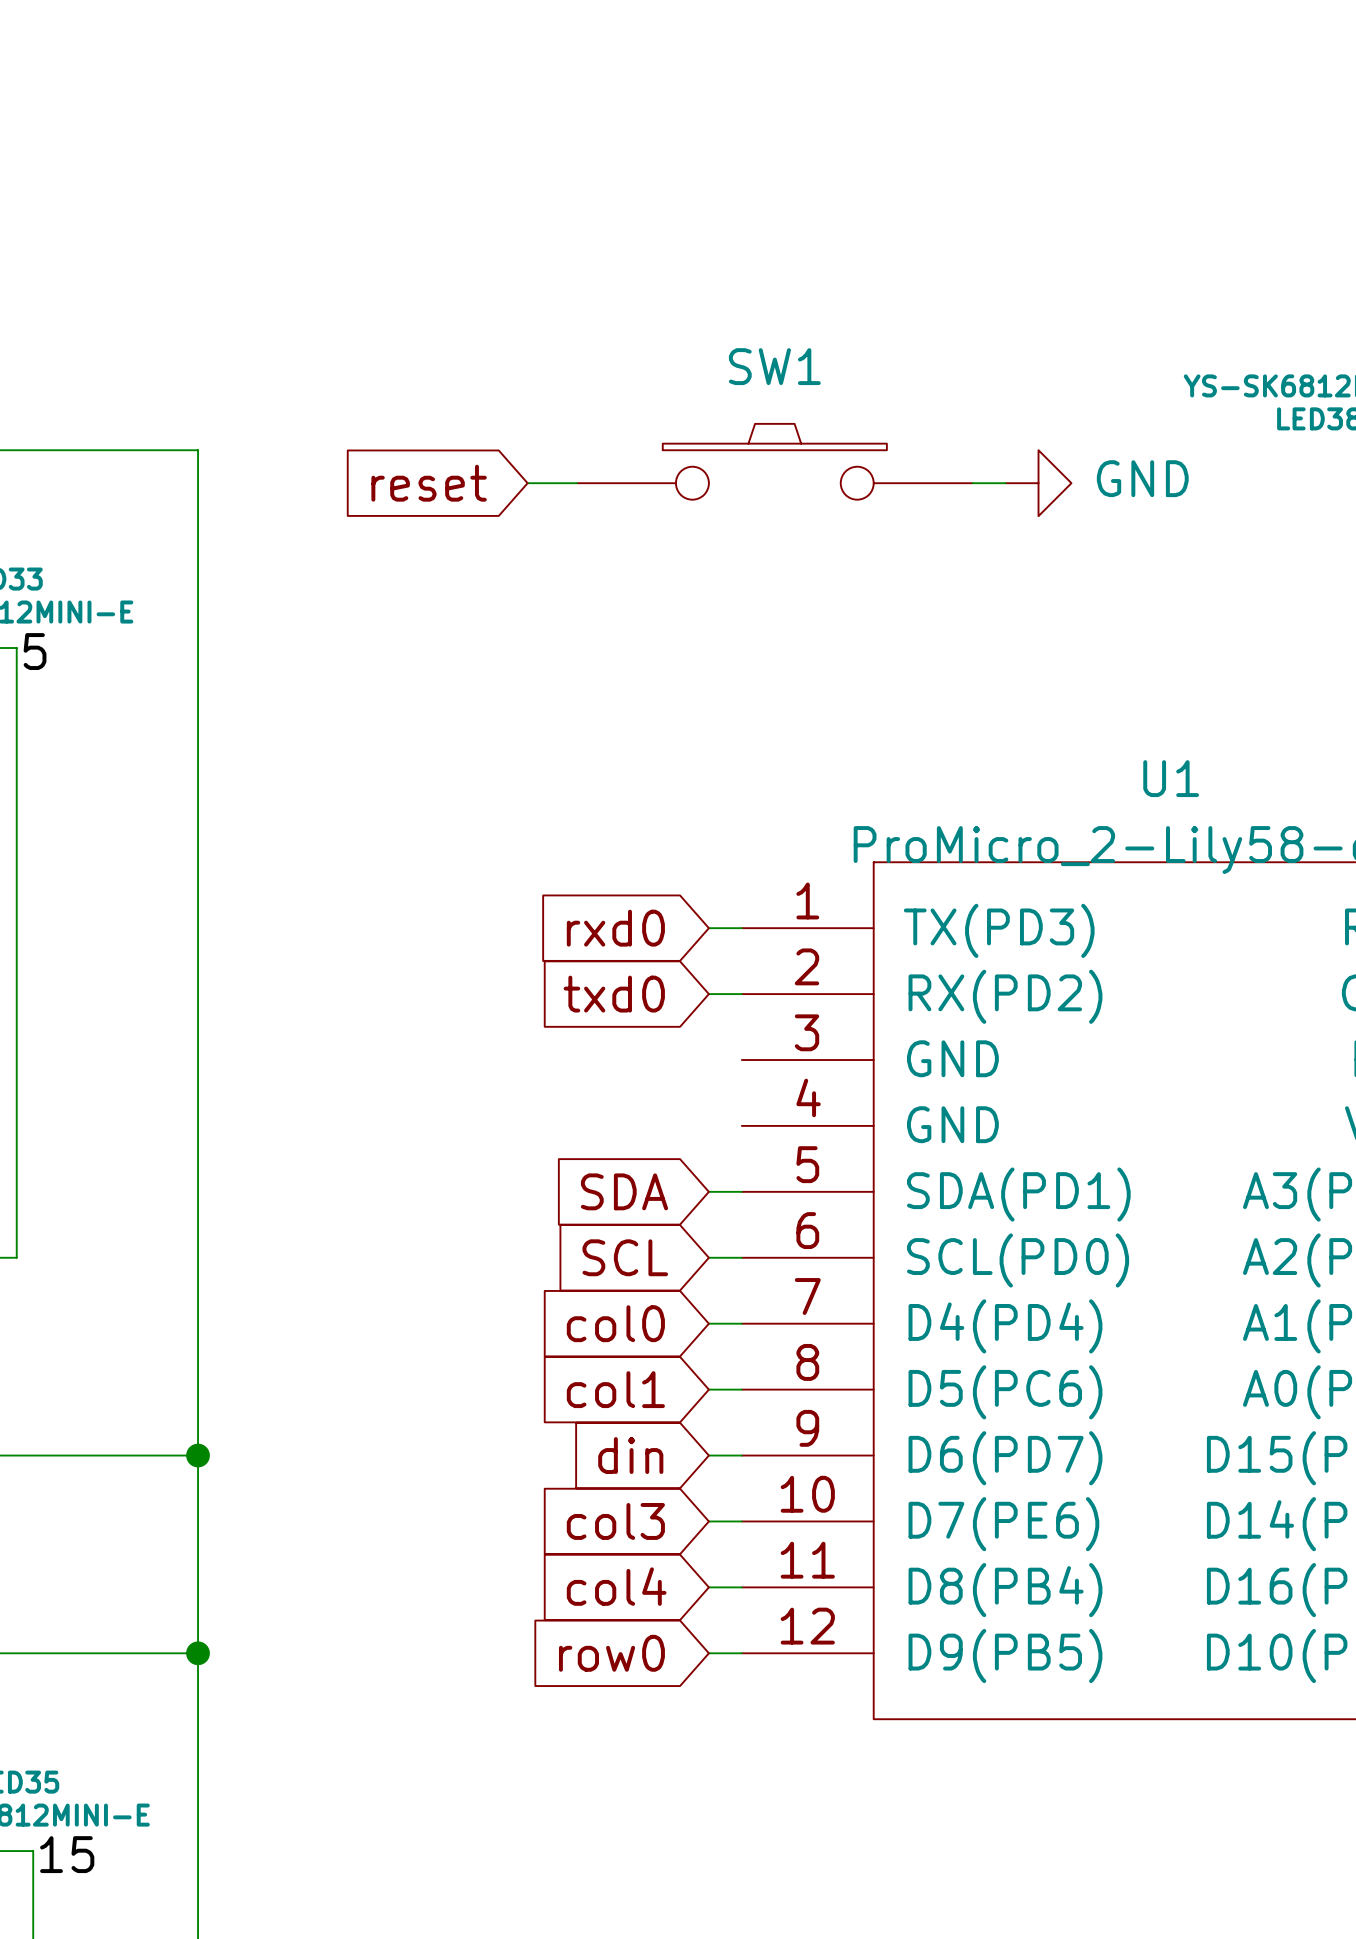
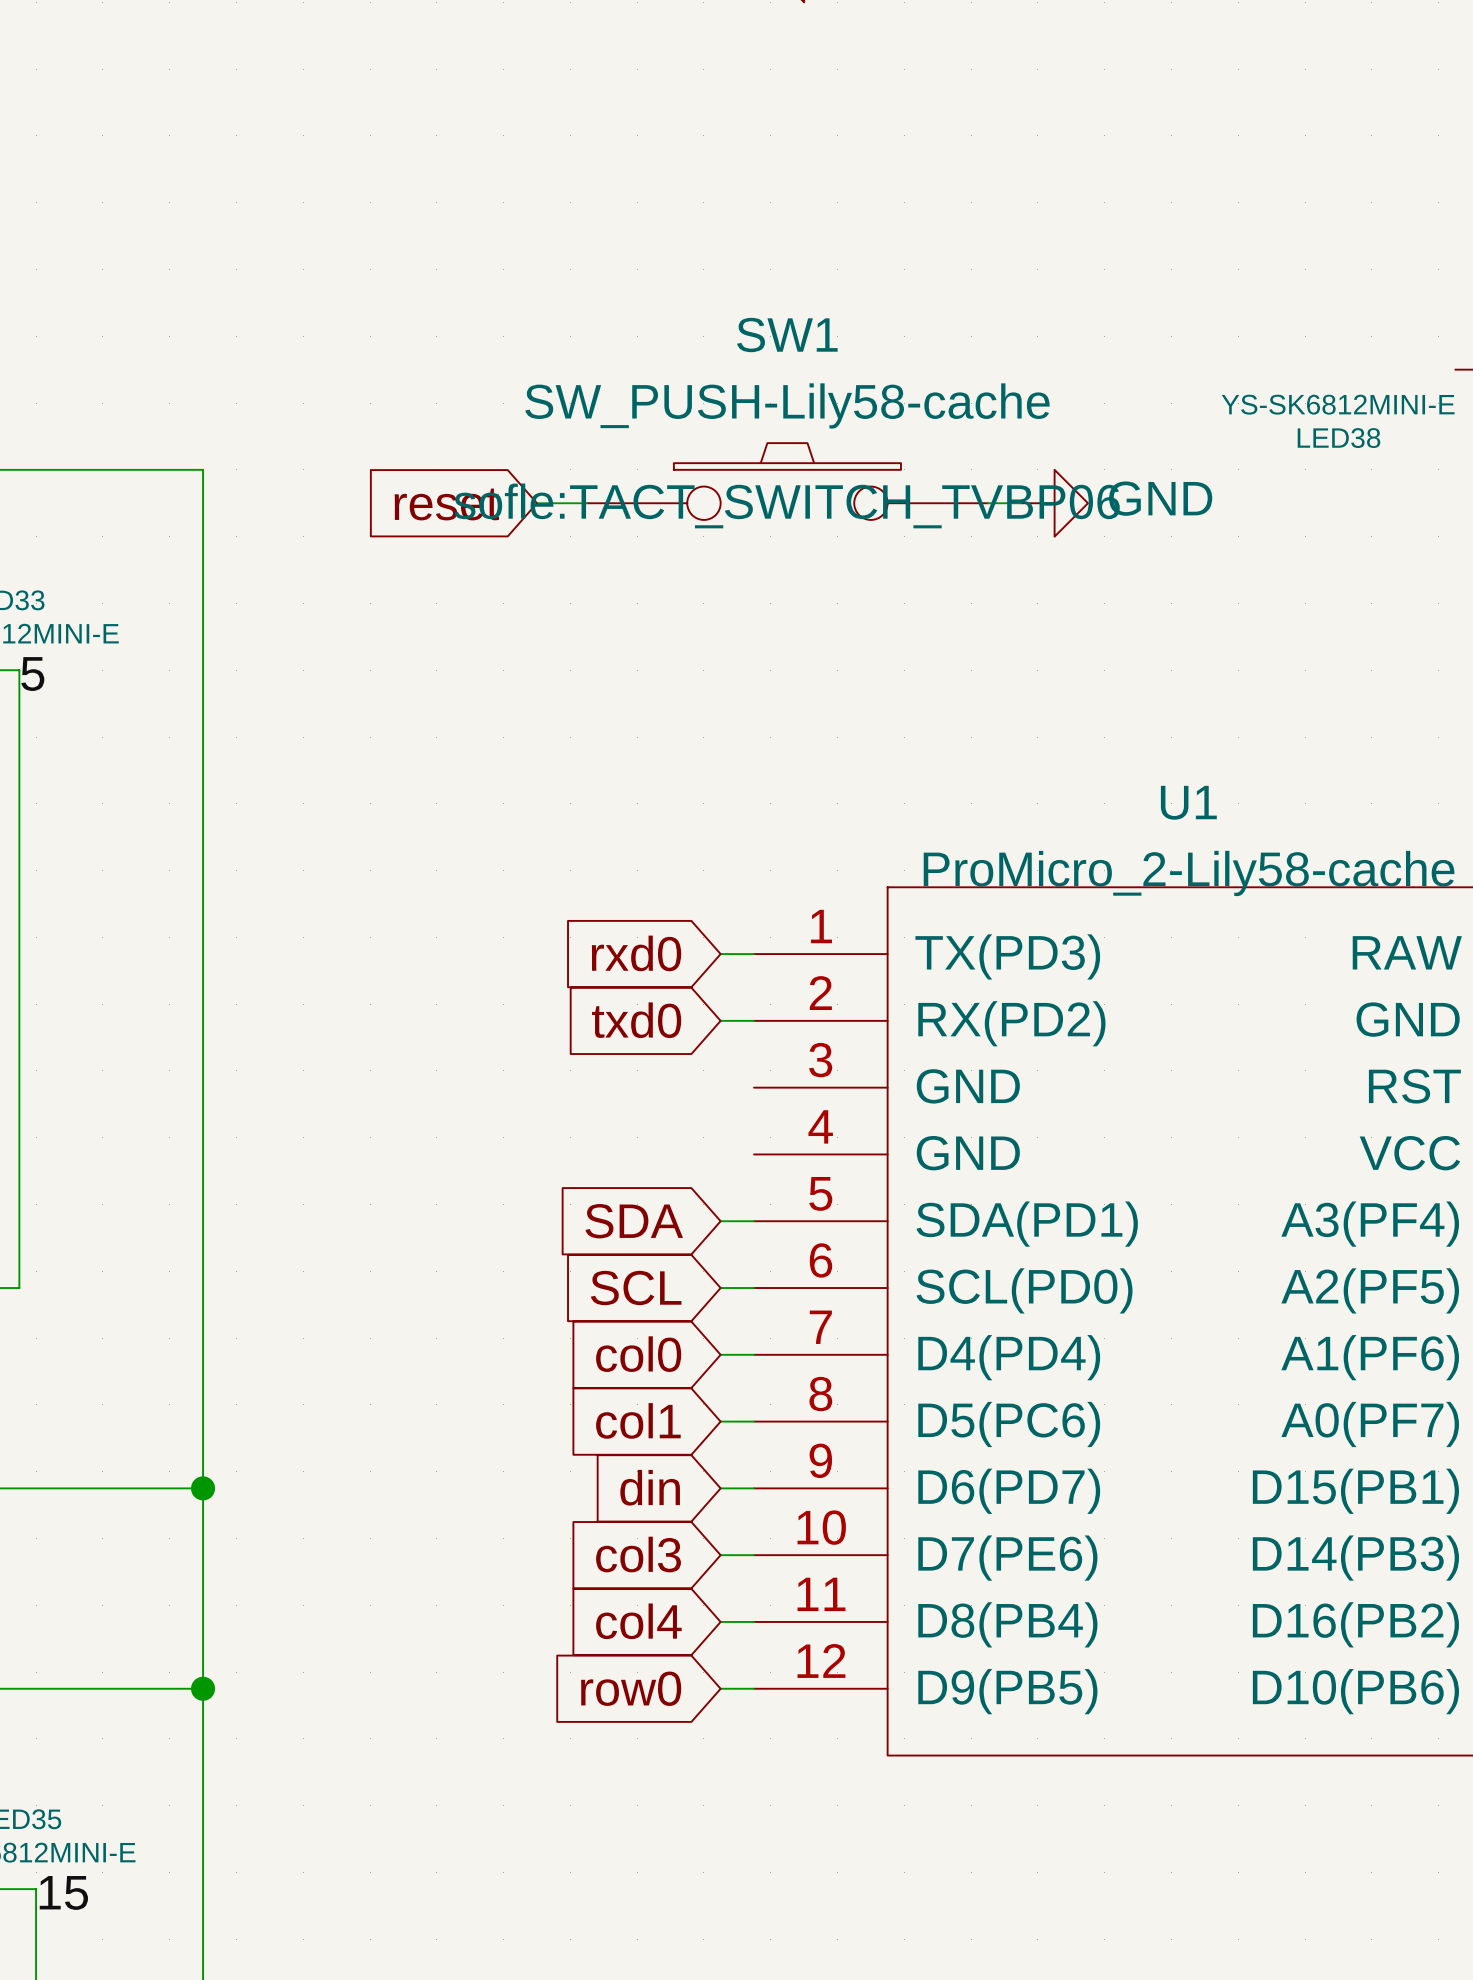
SW1 name position: SW1 (774, 366) -> SW1 (787, 335)
SW1 value: none -> SW_PUSH-Lily58-cache (787, 405)
SW1 text: none -> sofle:TACT_SWITCH_TVBP06 (787, 505)

